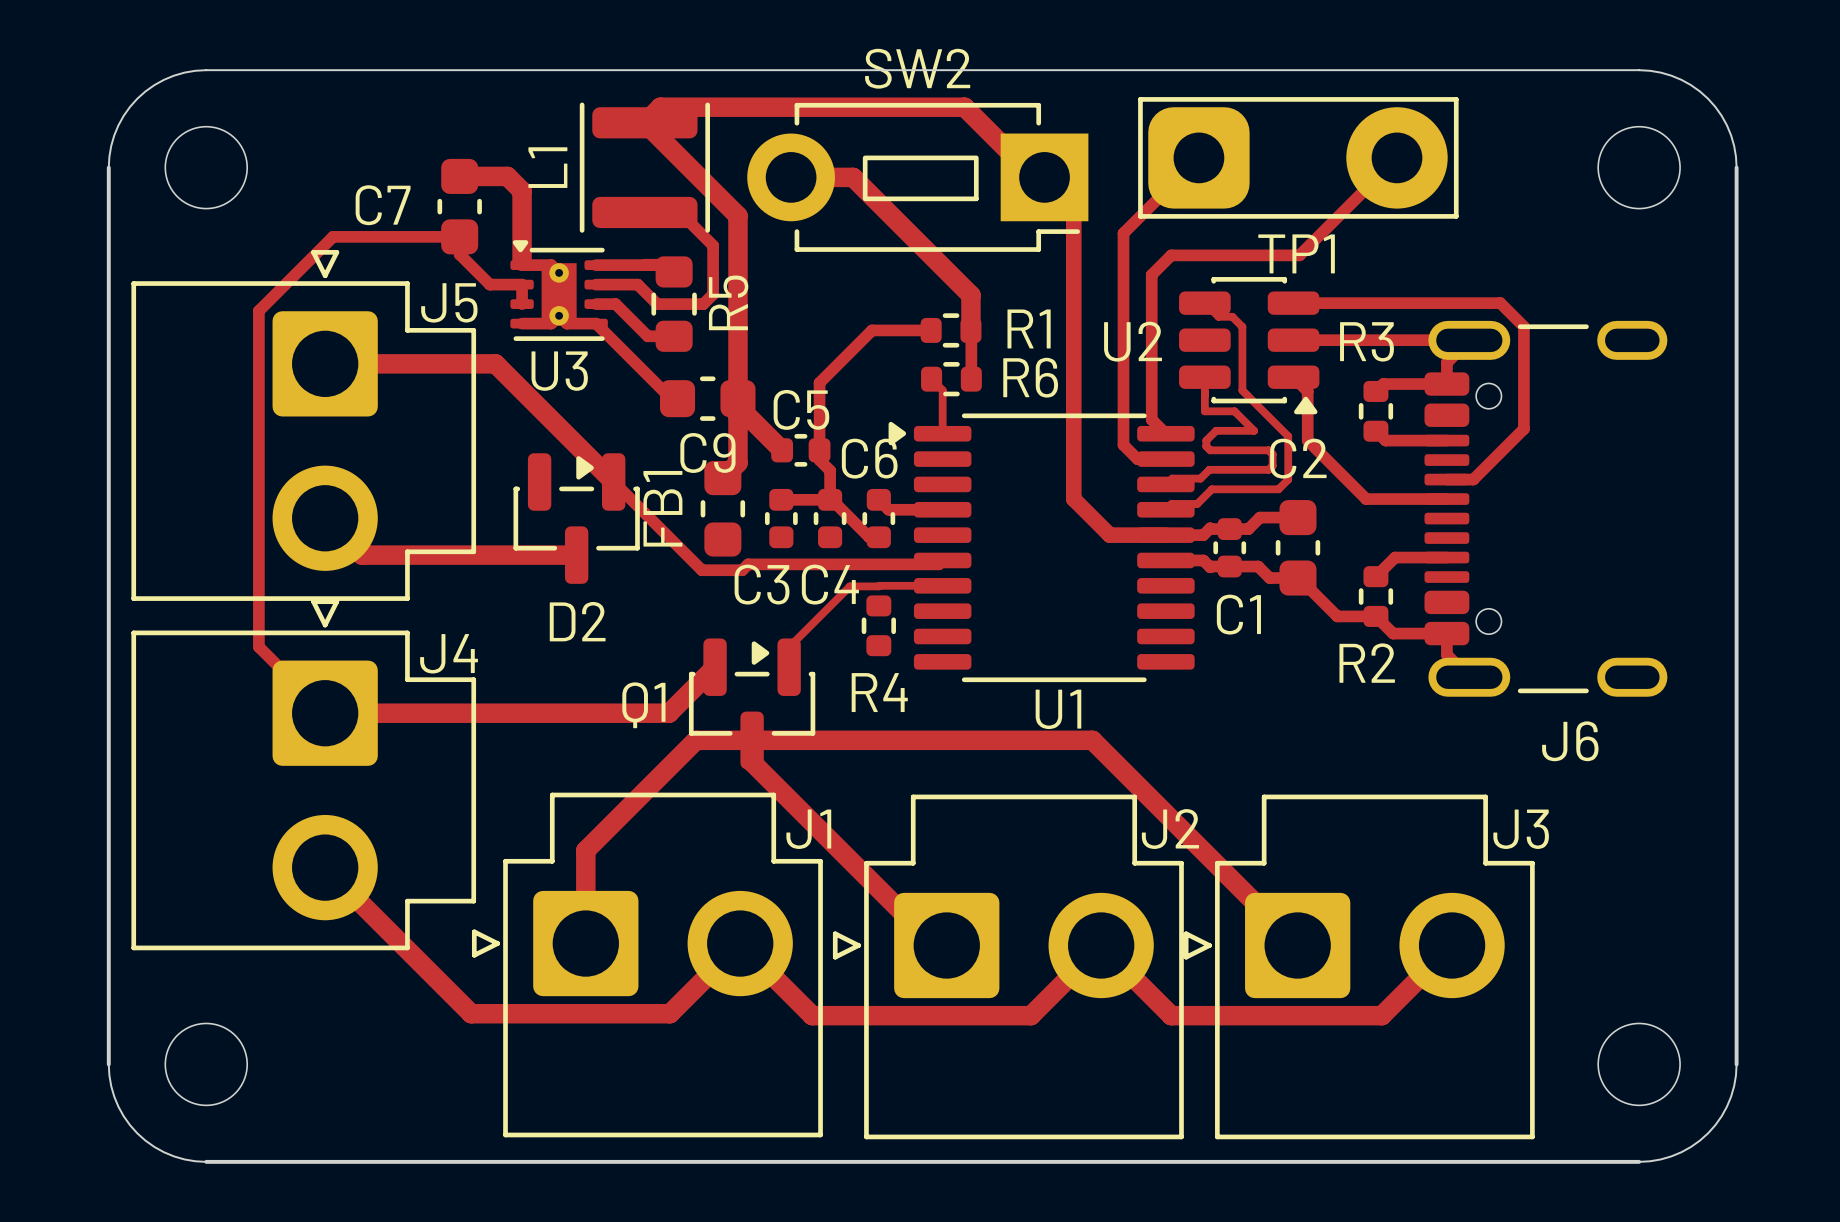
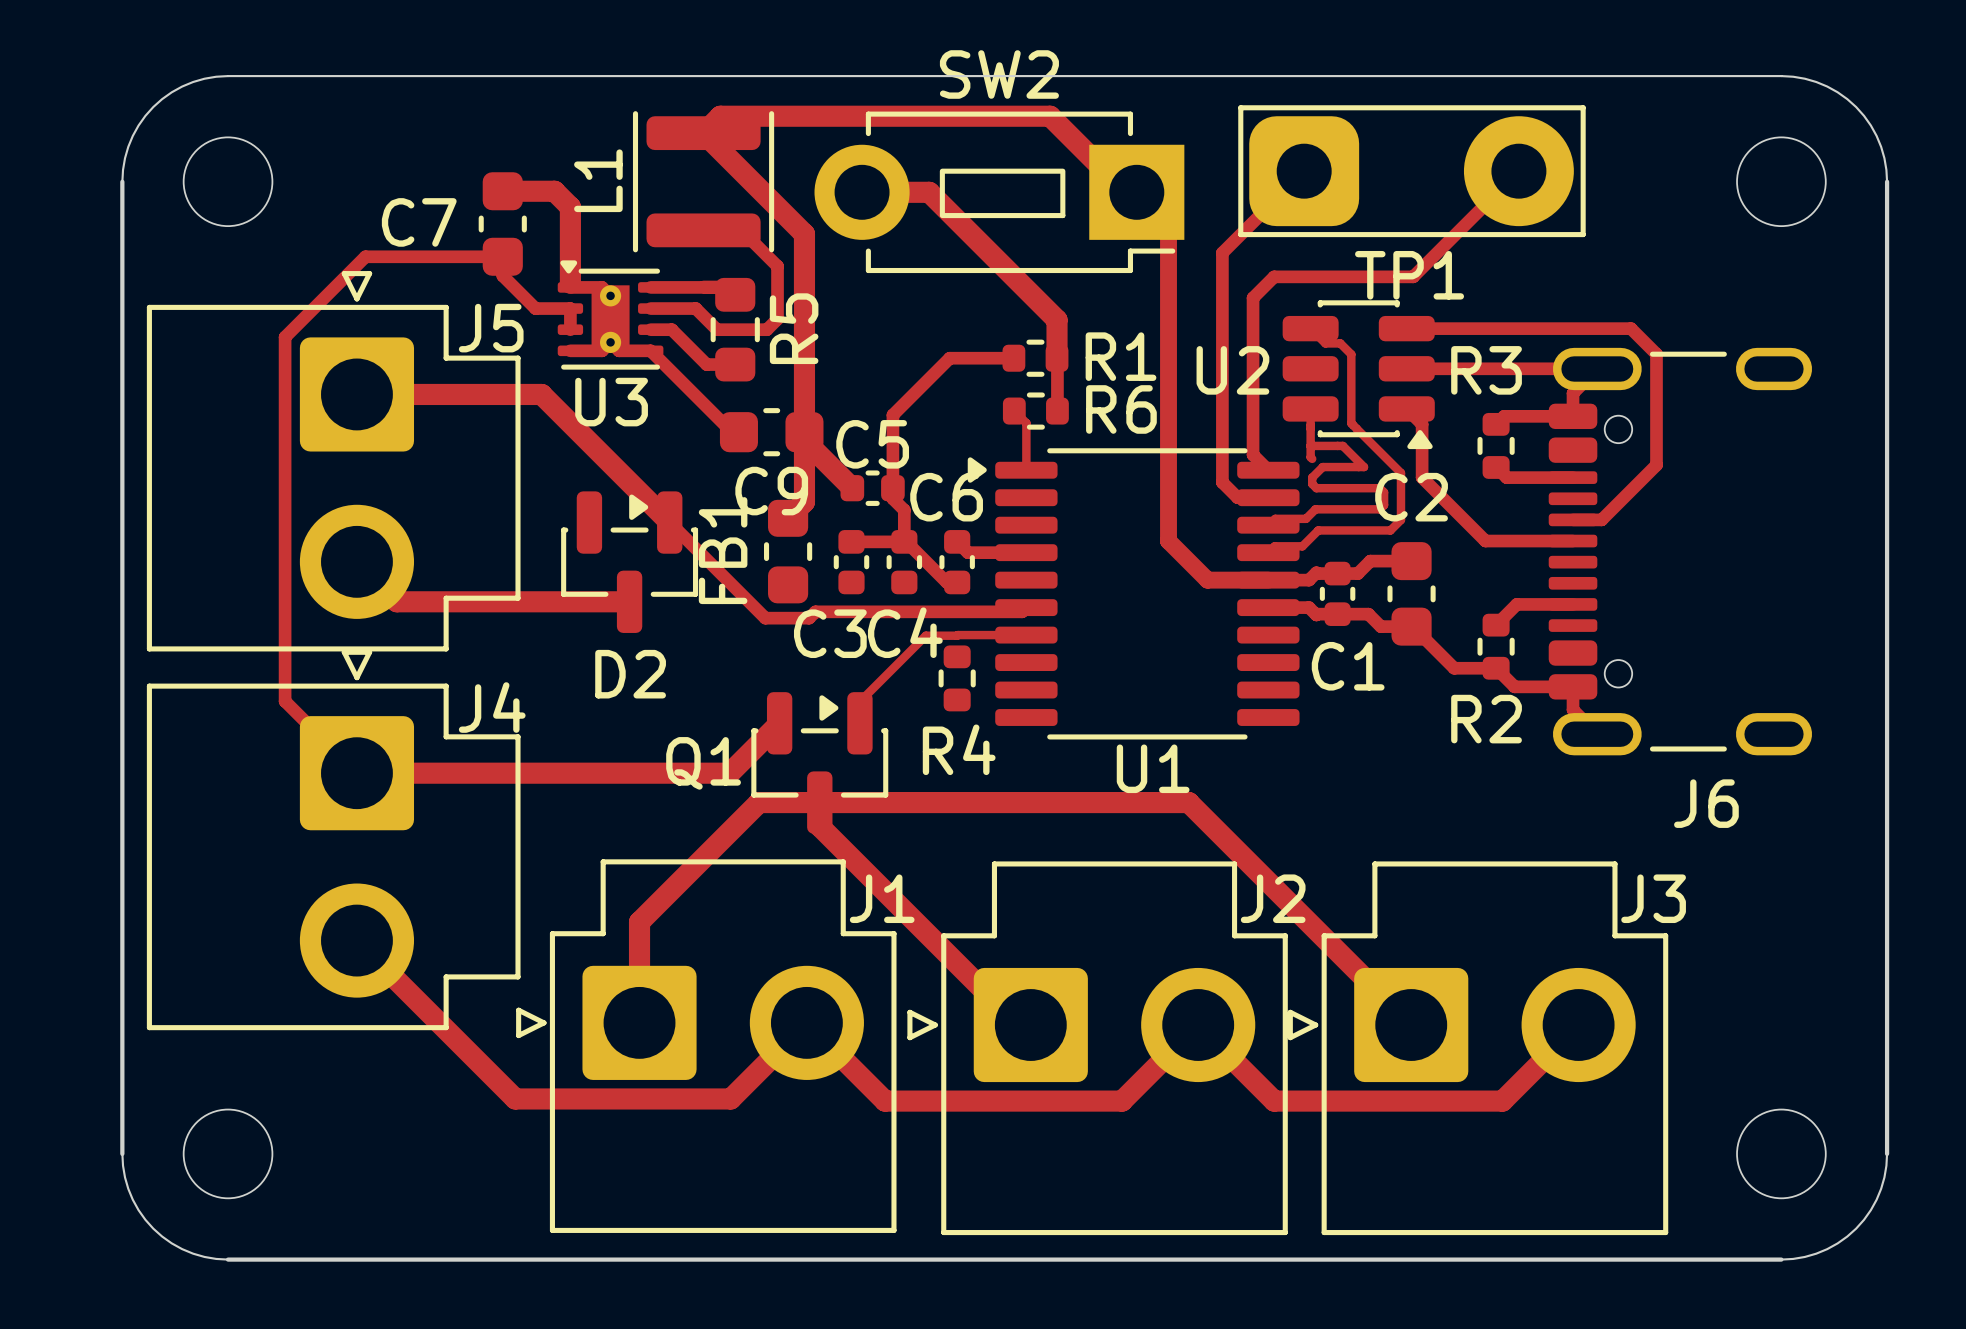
track: none -> (1310, 445) (1312, 458)

